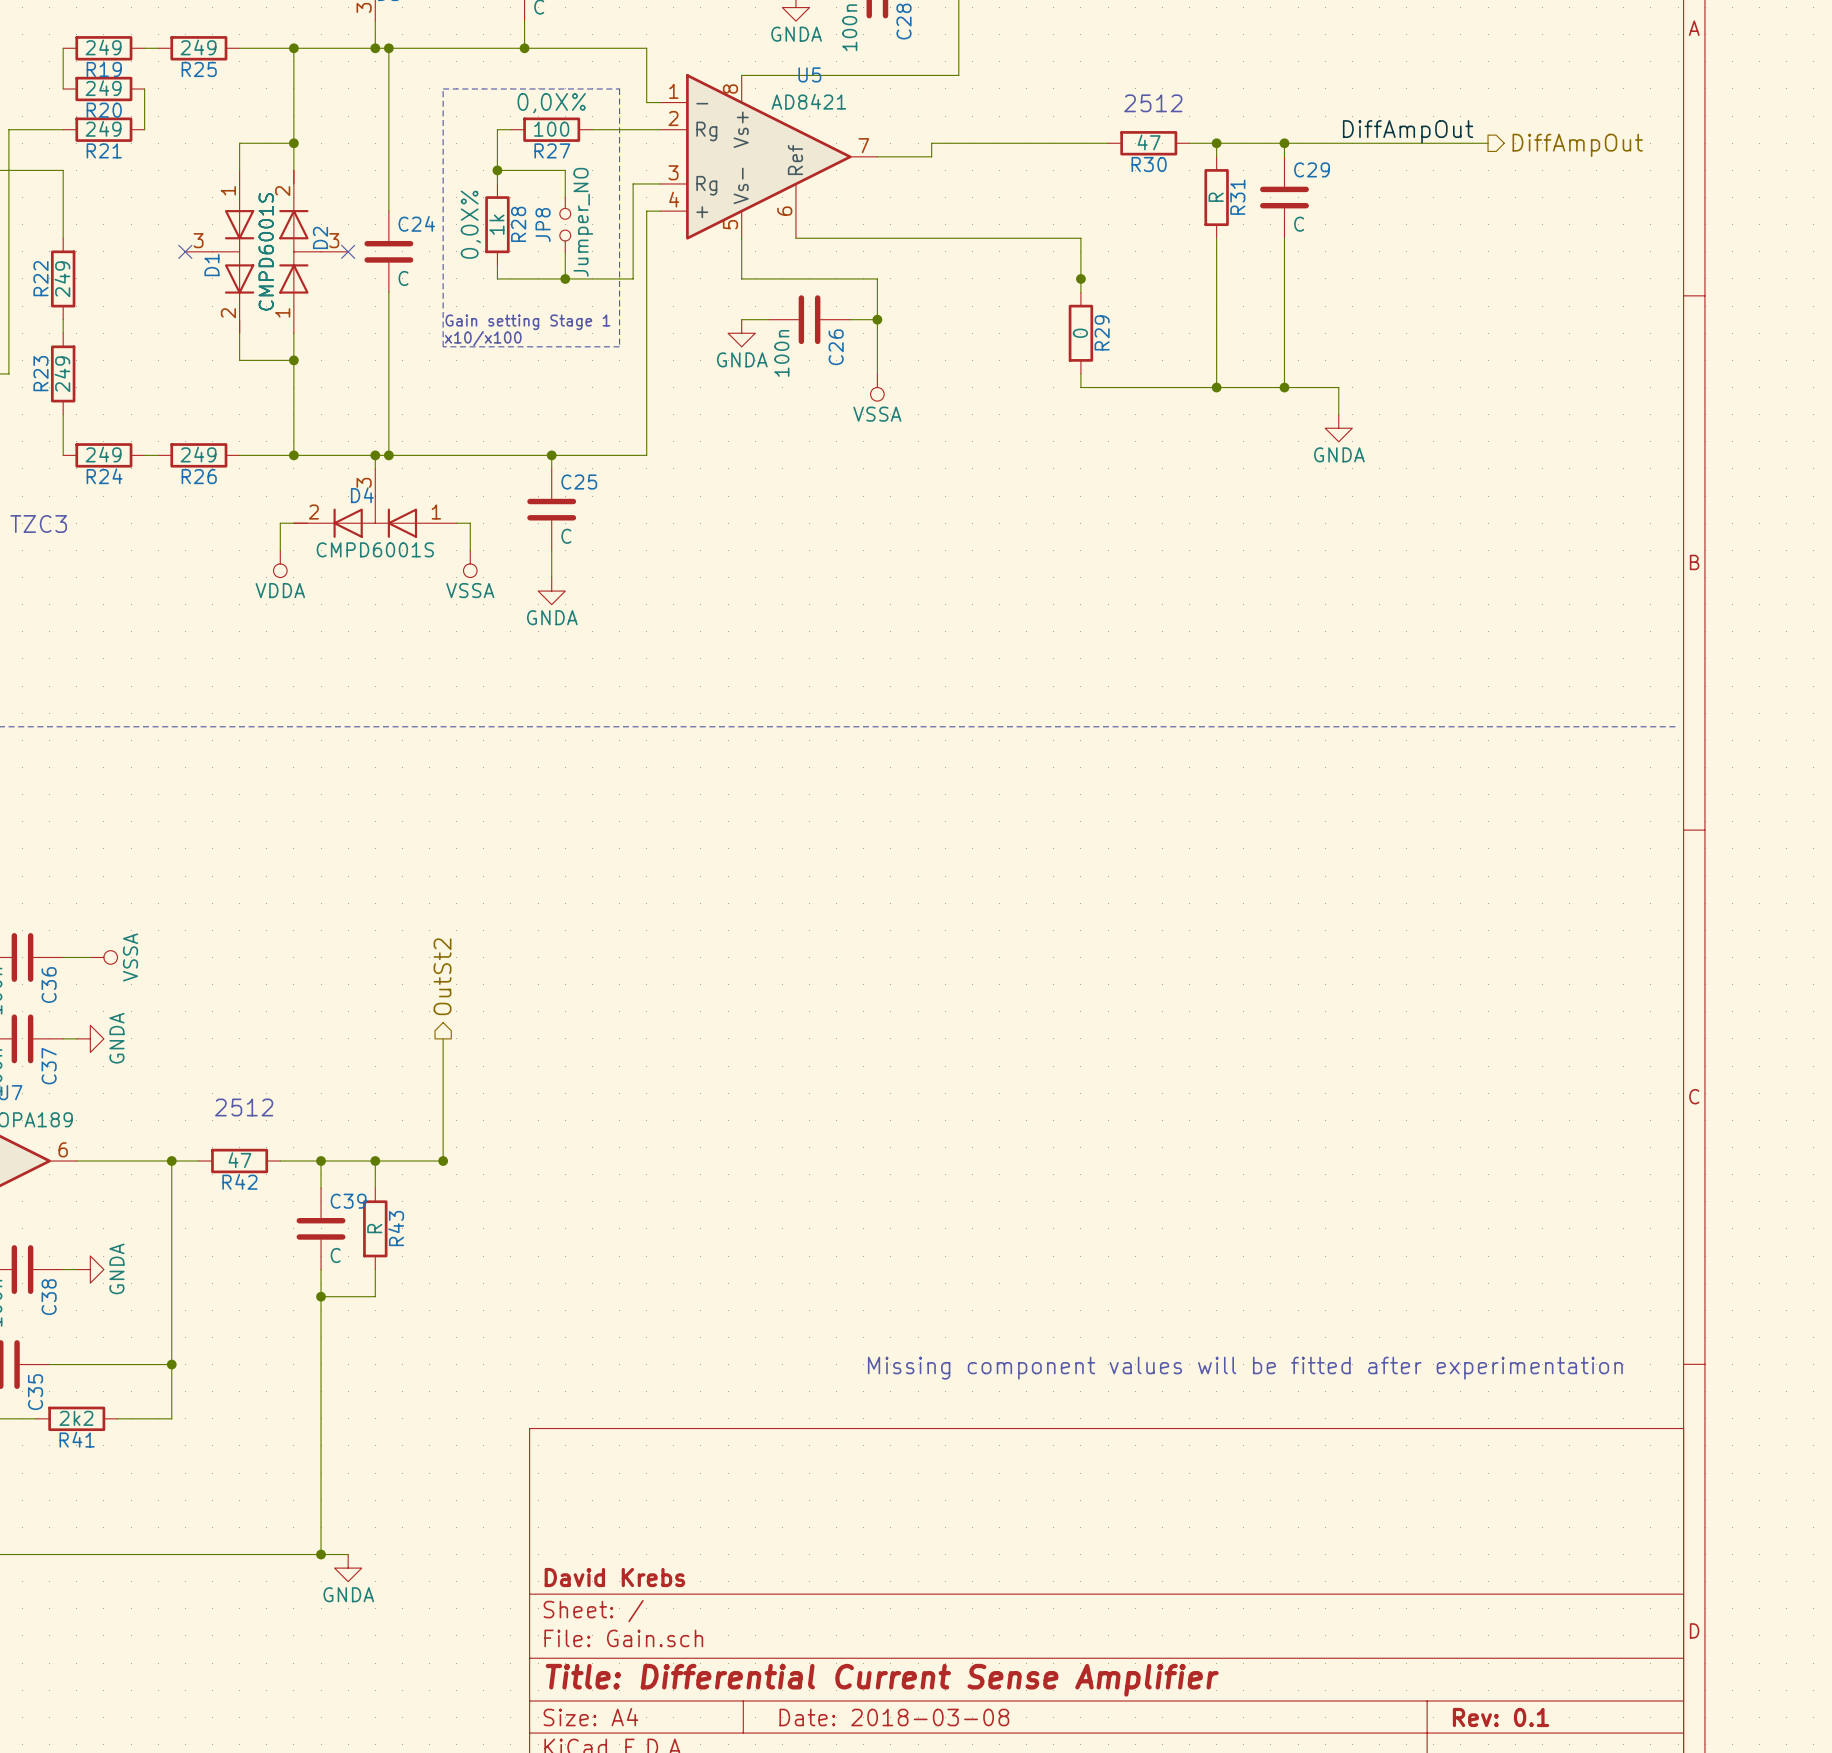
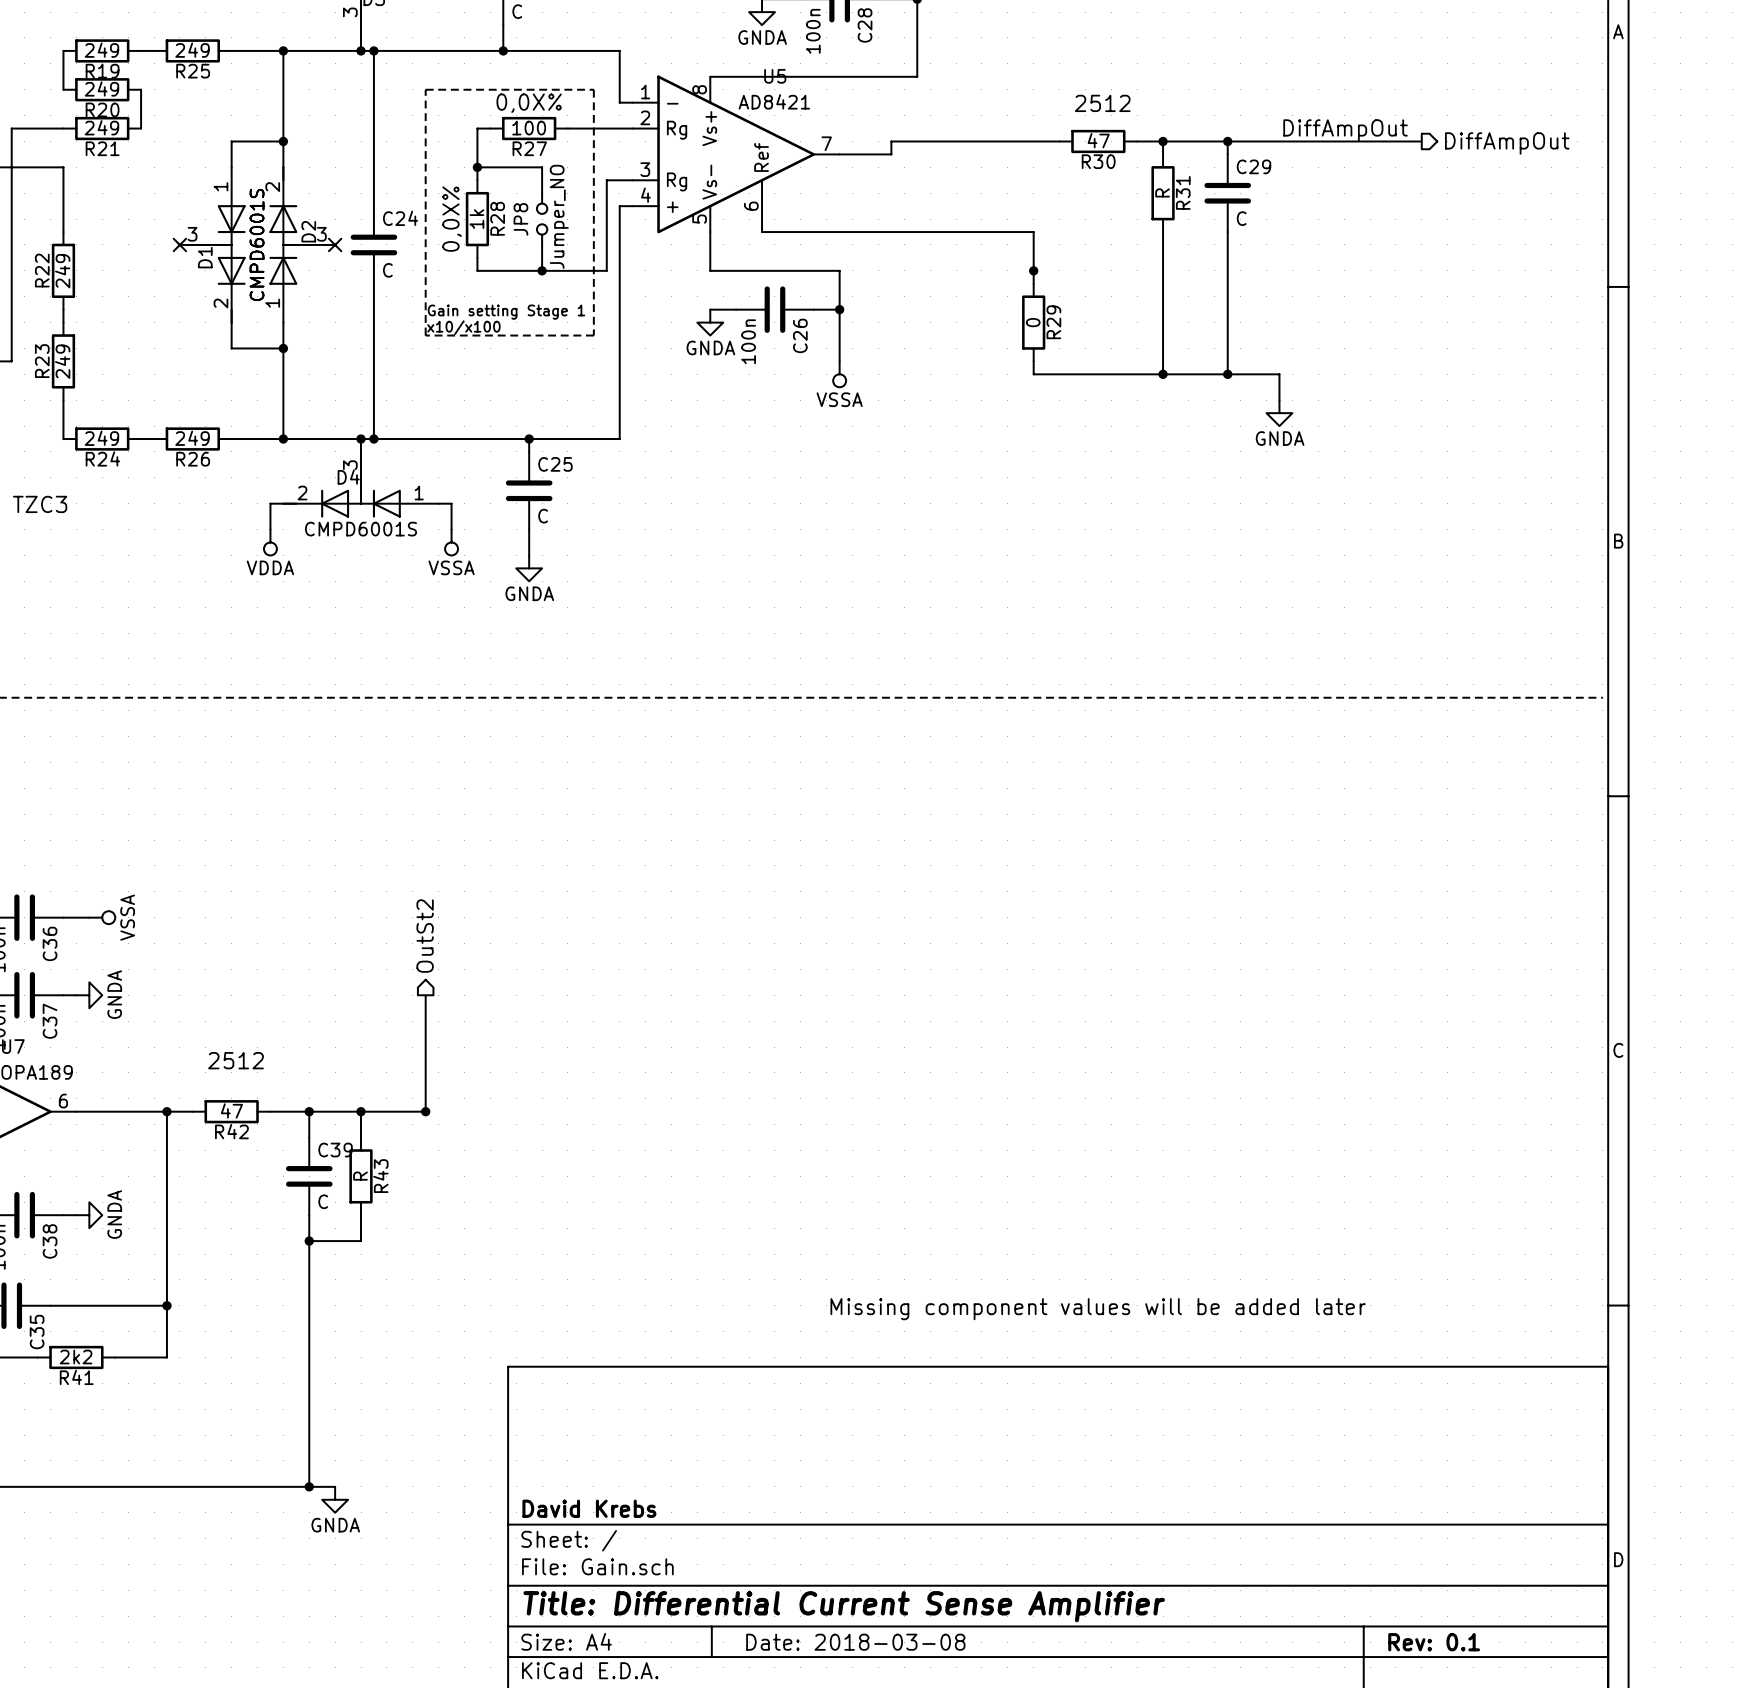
text: Missing component values will be fitted after experimentation (1245, 1368) -> Missing component values will be added later (1098, 1309)

